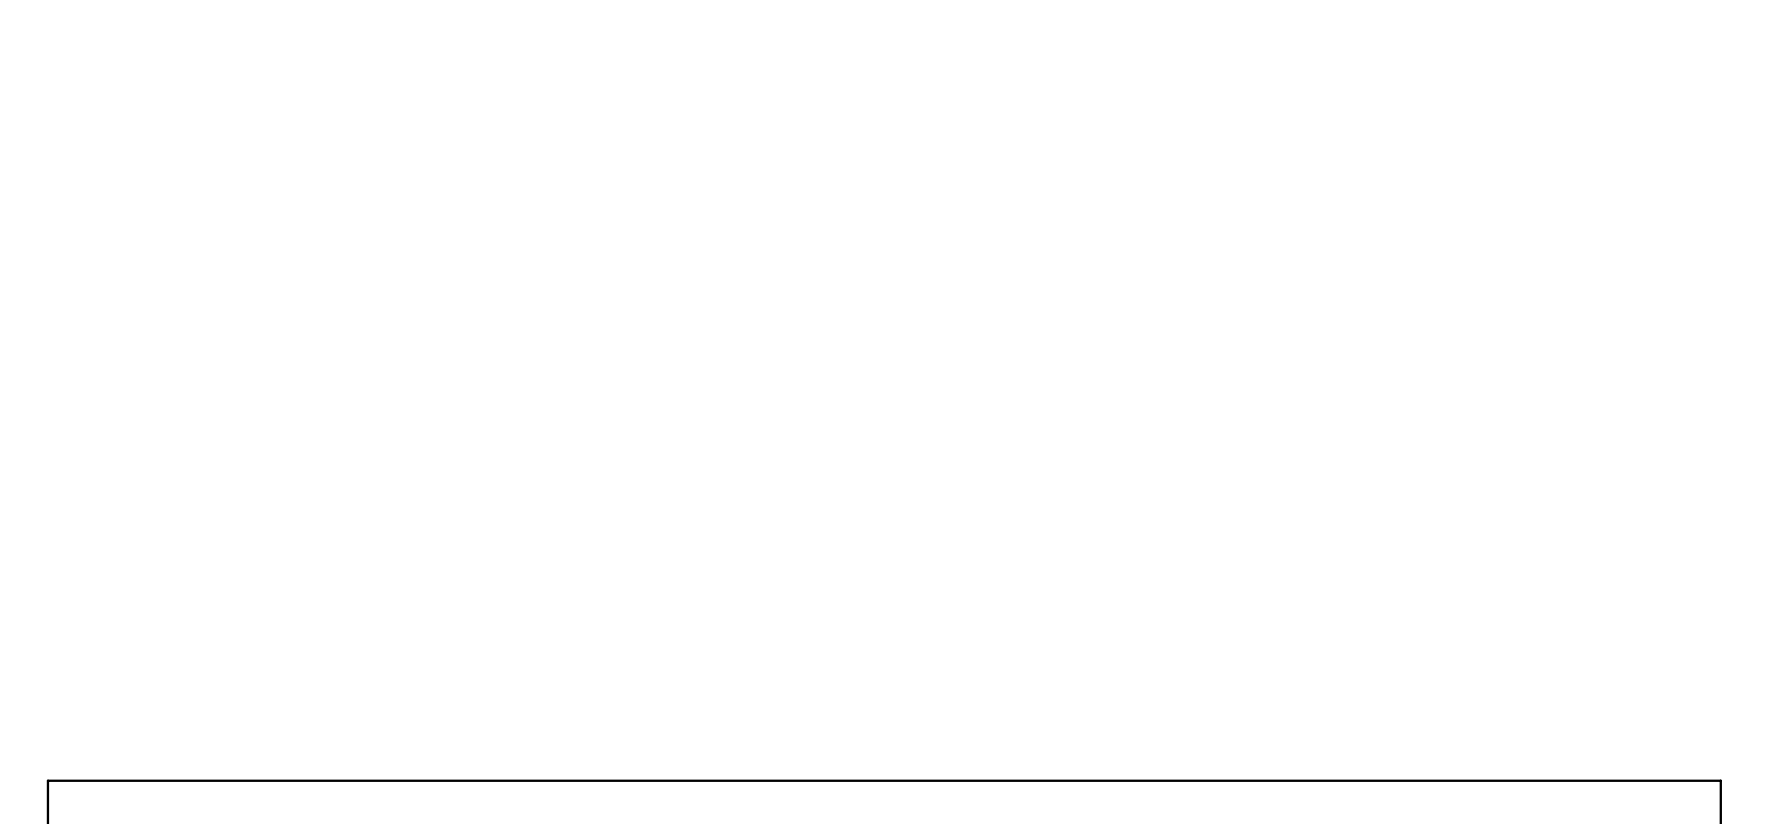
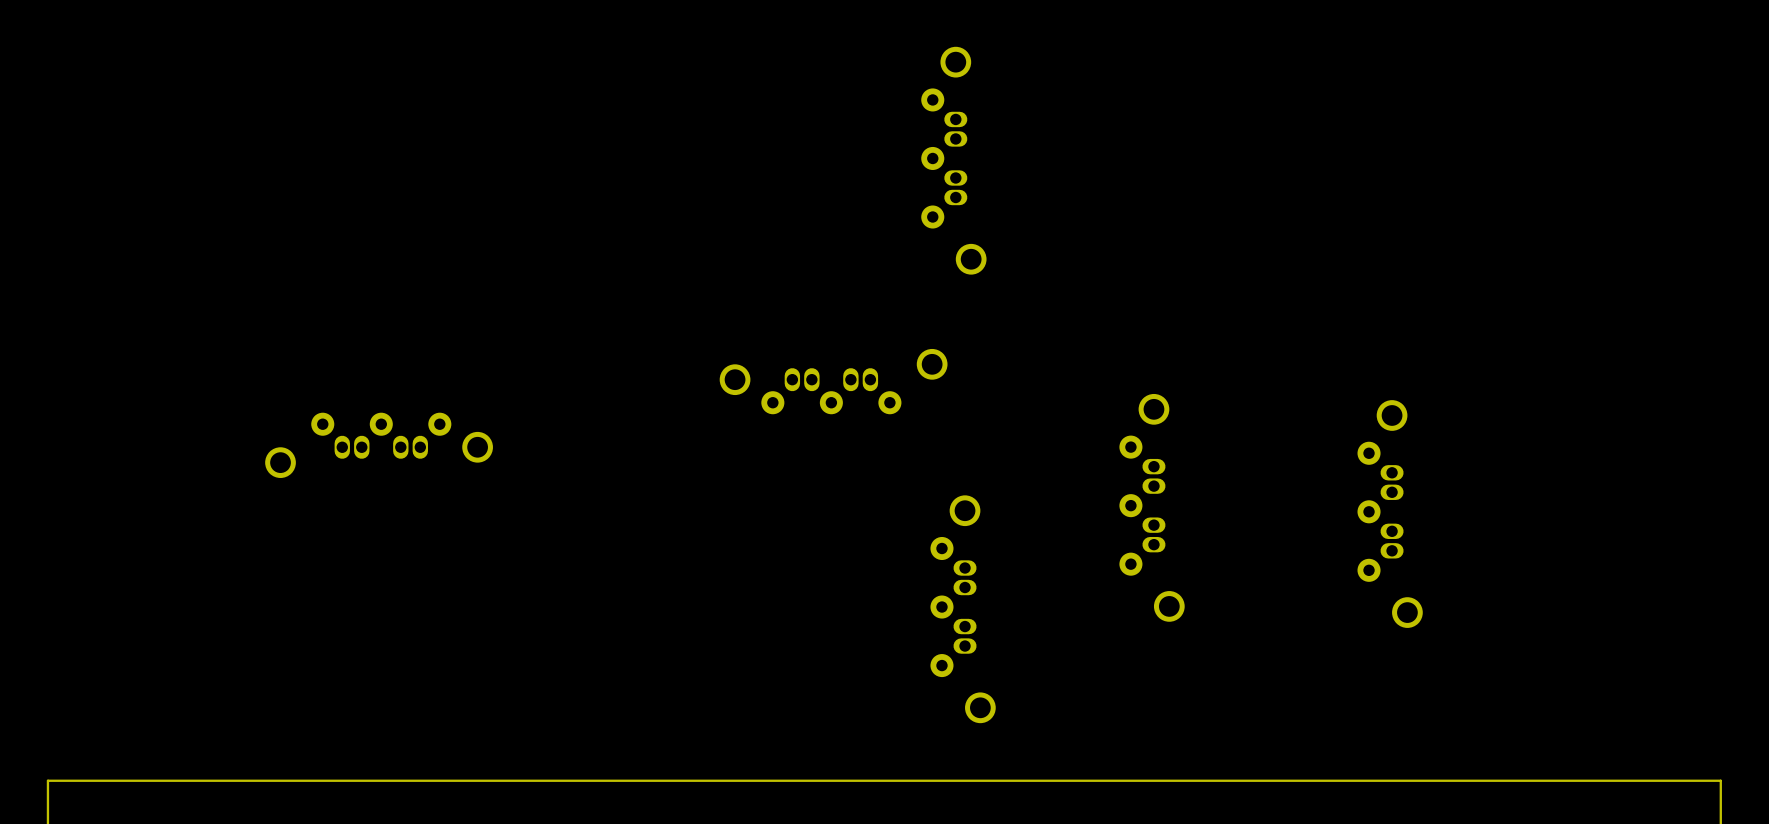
part: none -> (953, 160)
part: none -> (833, 381)
part: none -> (379, 445)
part: none -> (1152, 507)
part: none -> (1390, 514)
part: none -> (963, 609)

